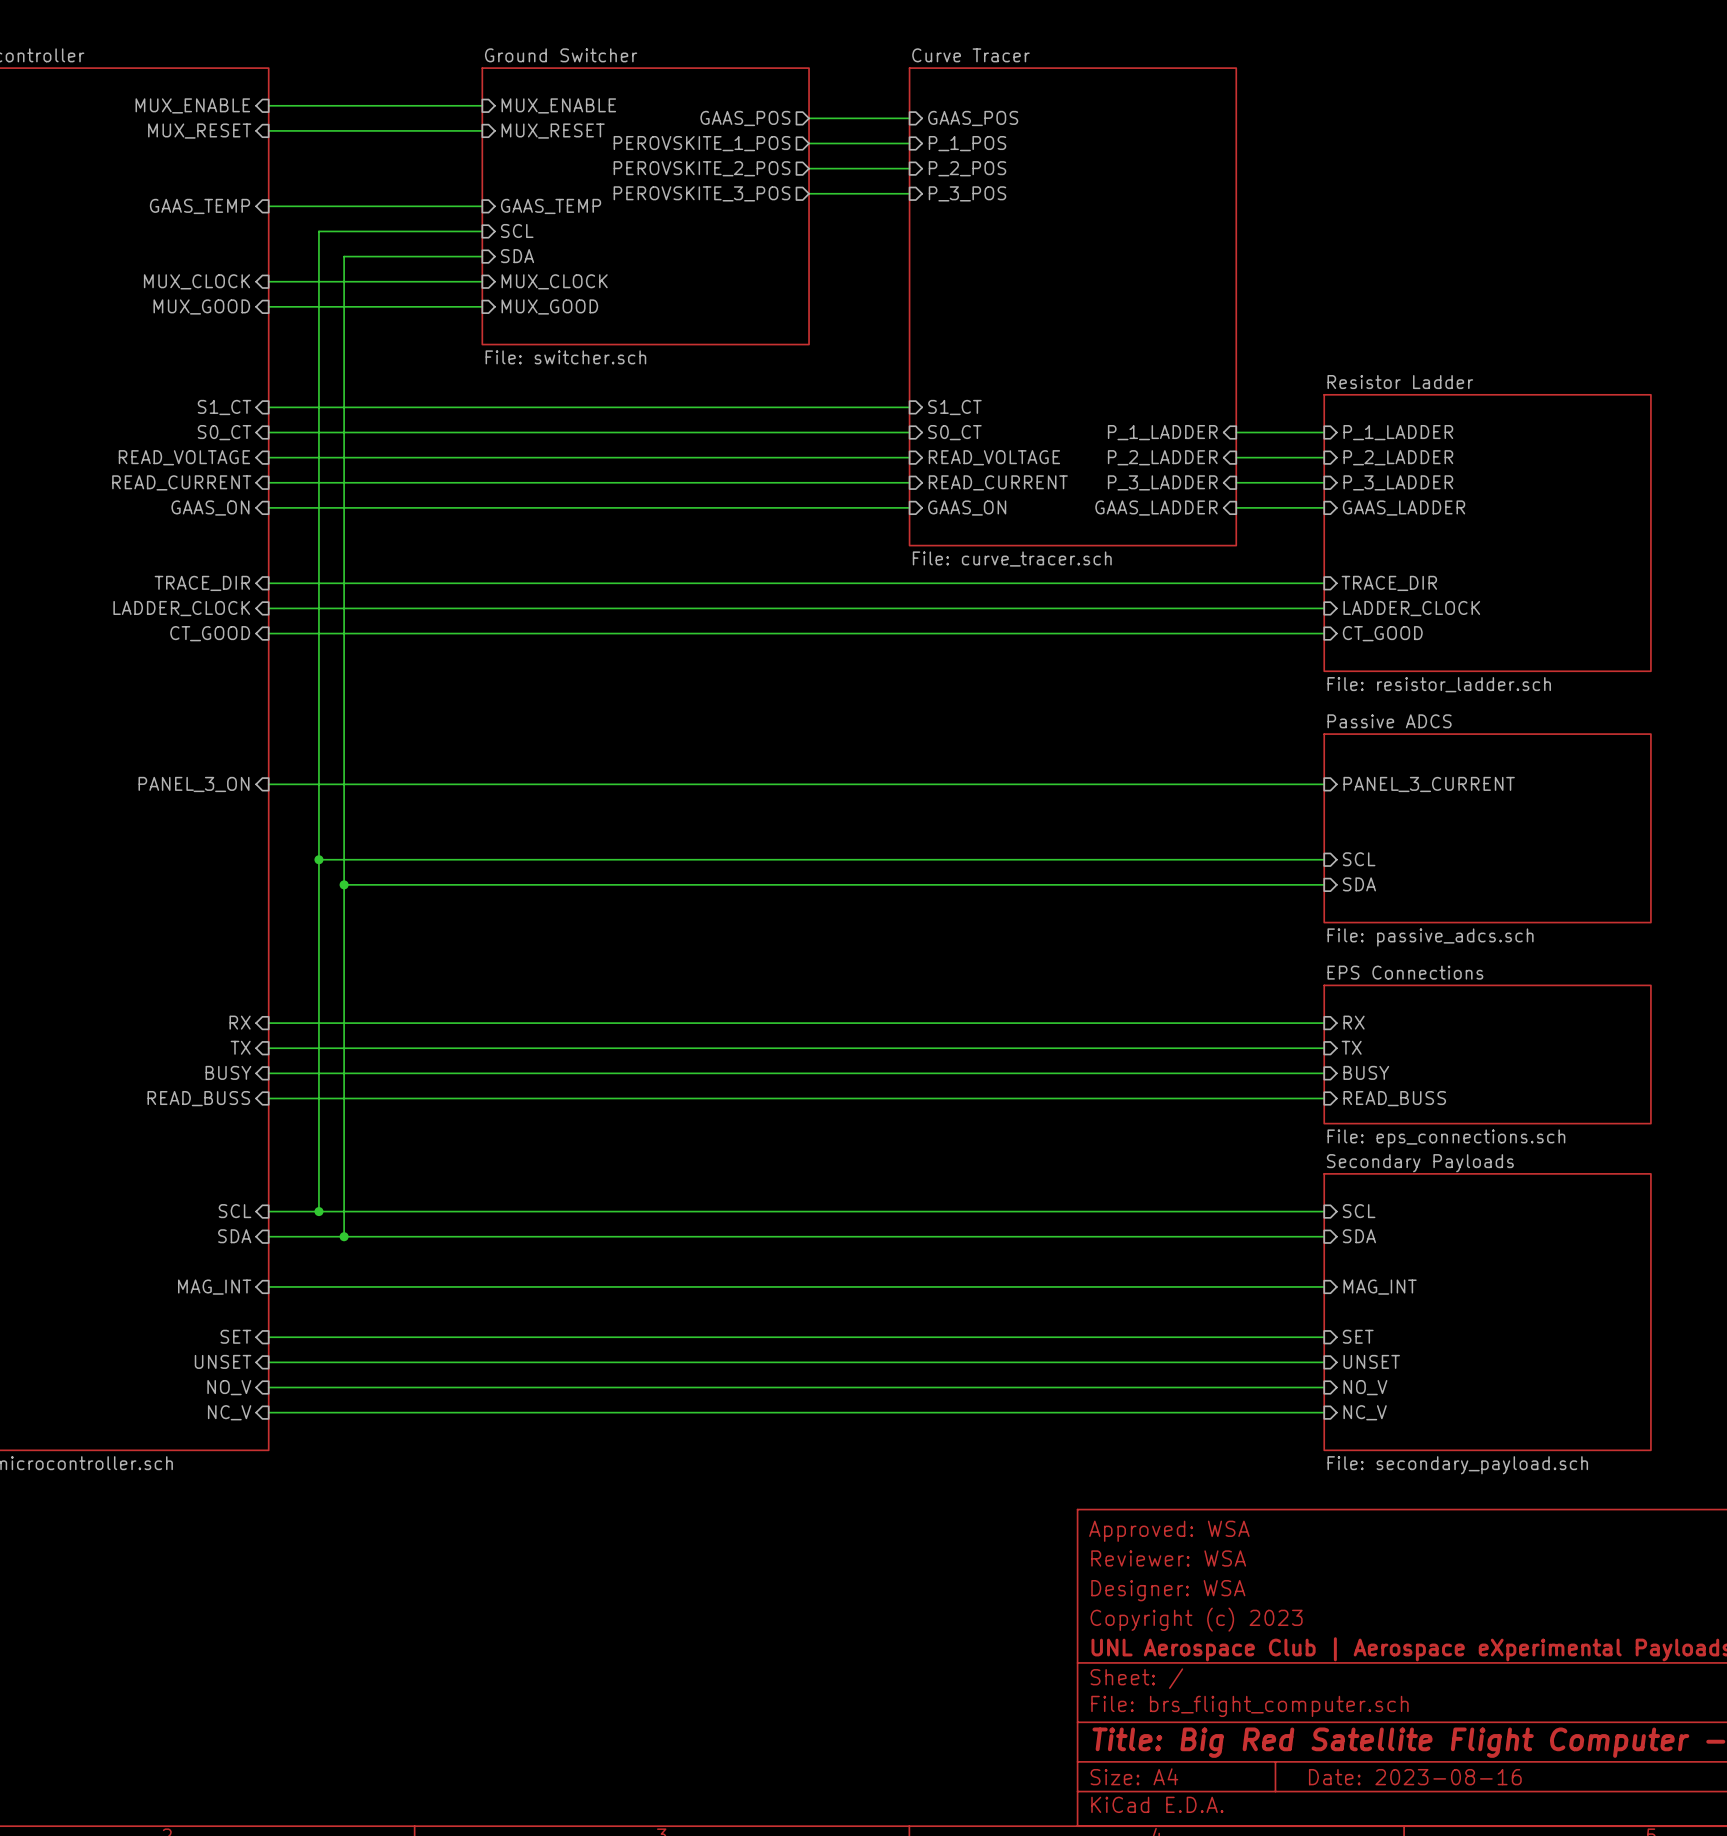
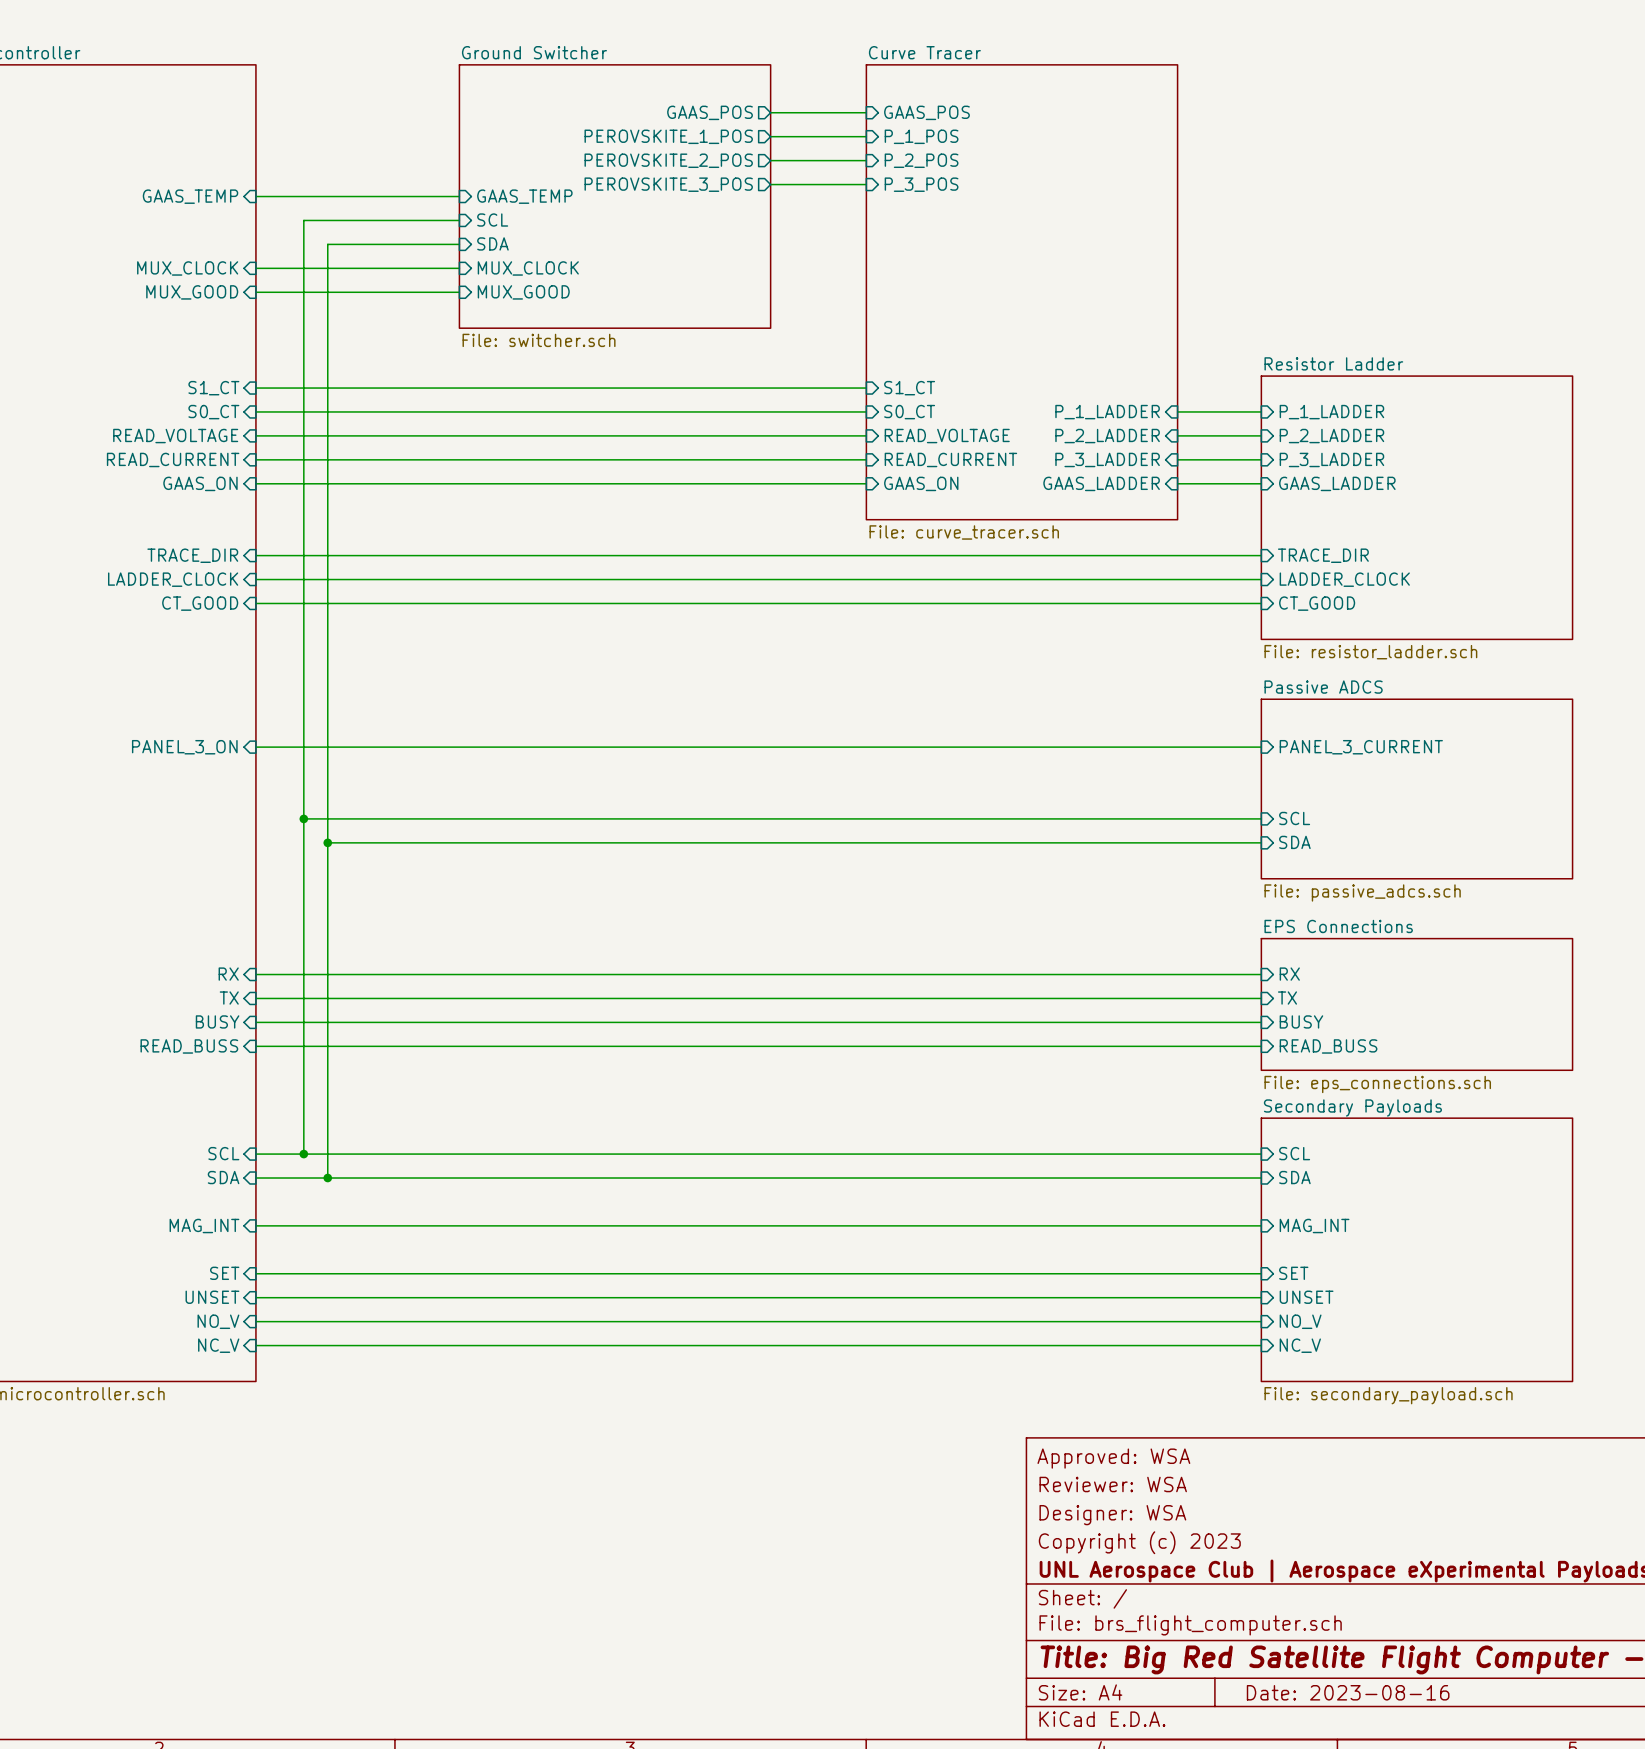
sheet pin: MUX_ENABLE (192, 105) -> none
wire: (268, 105) (482, 105) -> none
sheet pin: MUX_ENABLE (558, 105) -> none
wire: (268, 130) (482, 130) -> none
sheet pin: MUX_RESET (199, 131) -> none
sheet pin: MUX_RESET (553, 131) -> none

